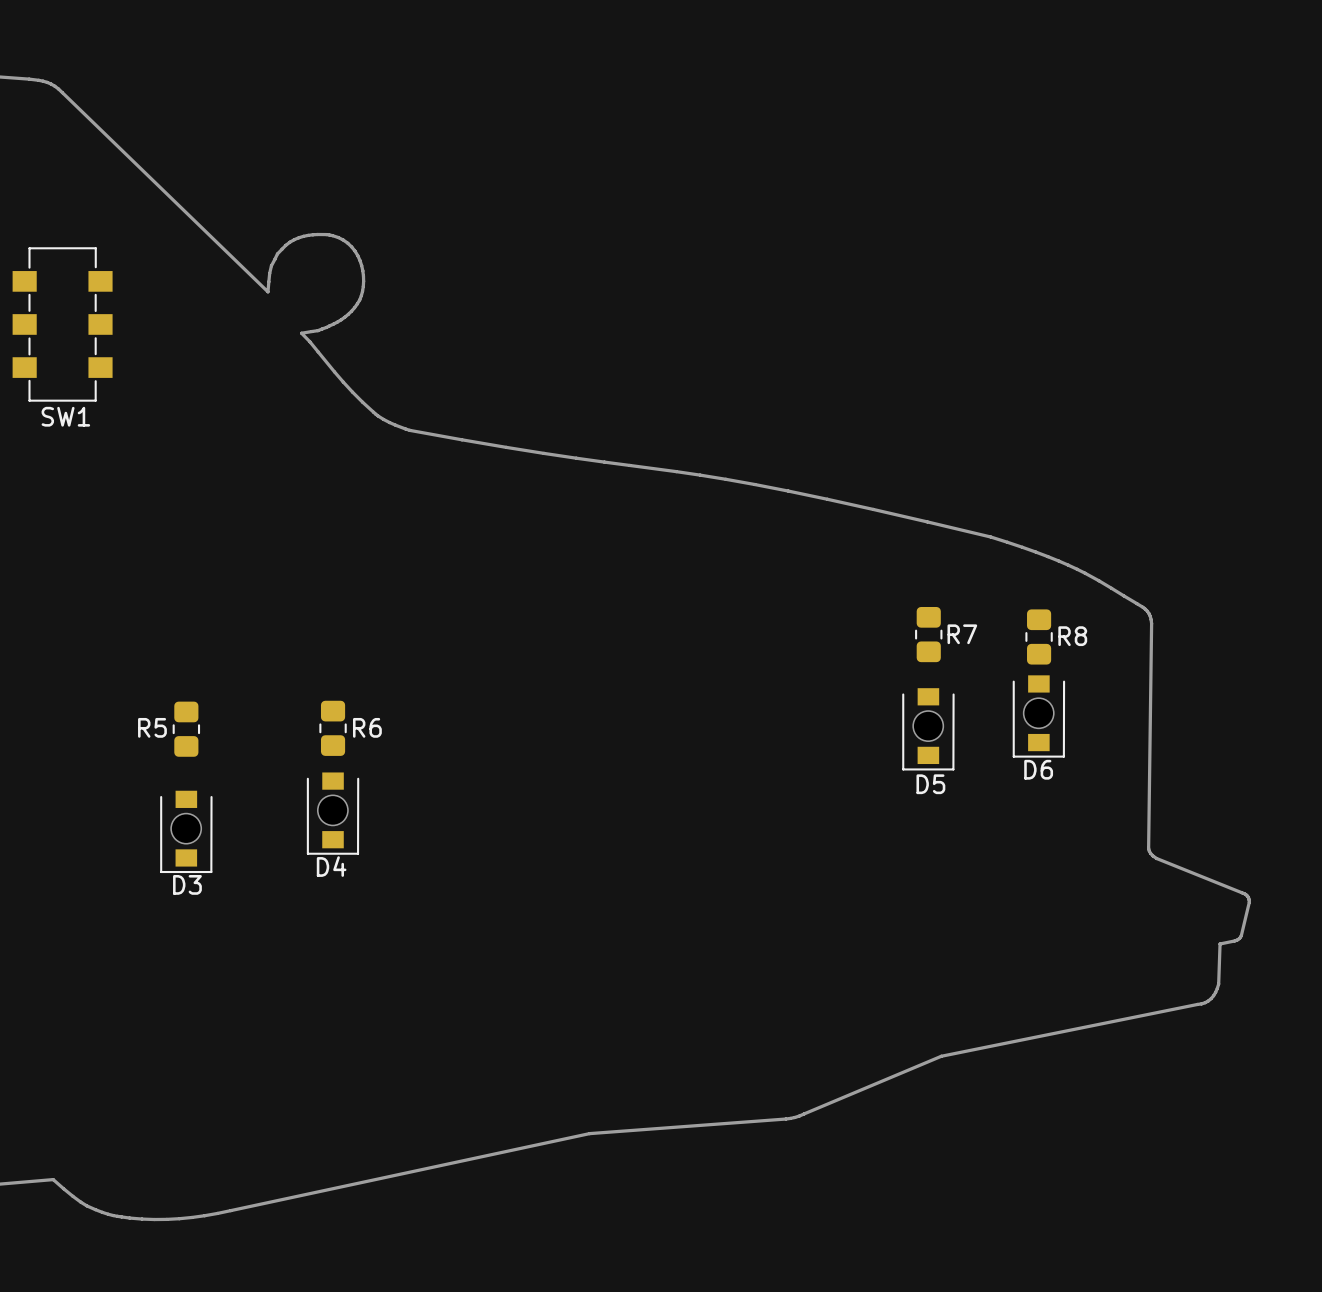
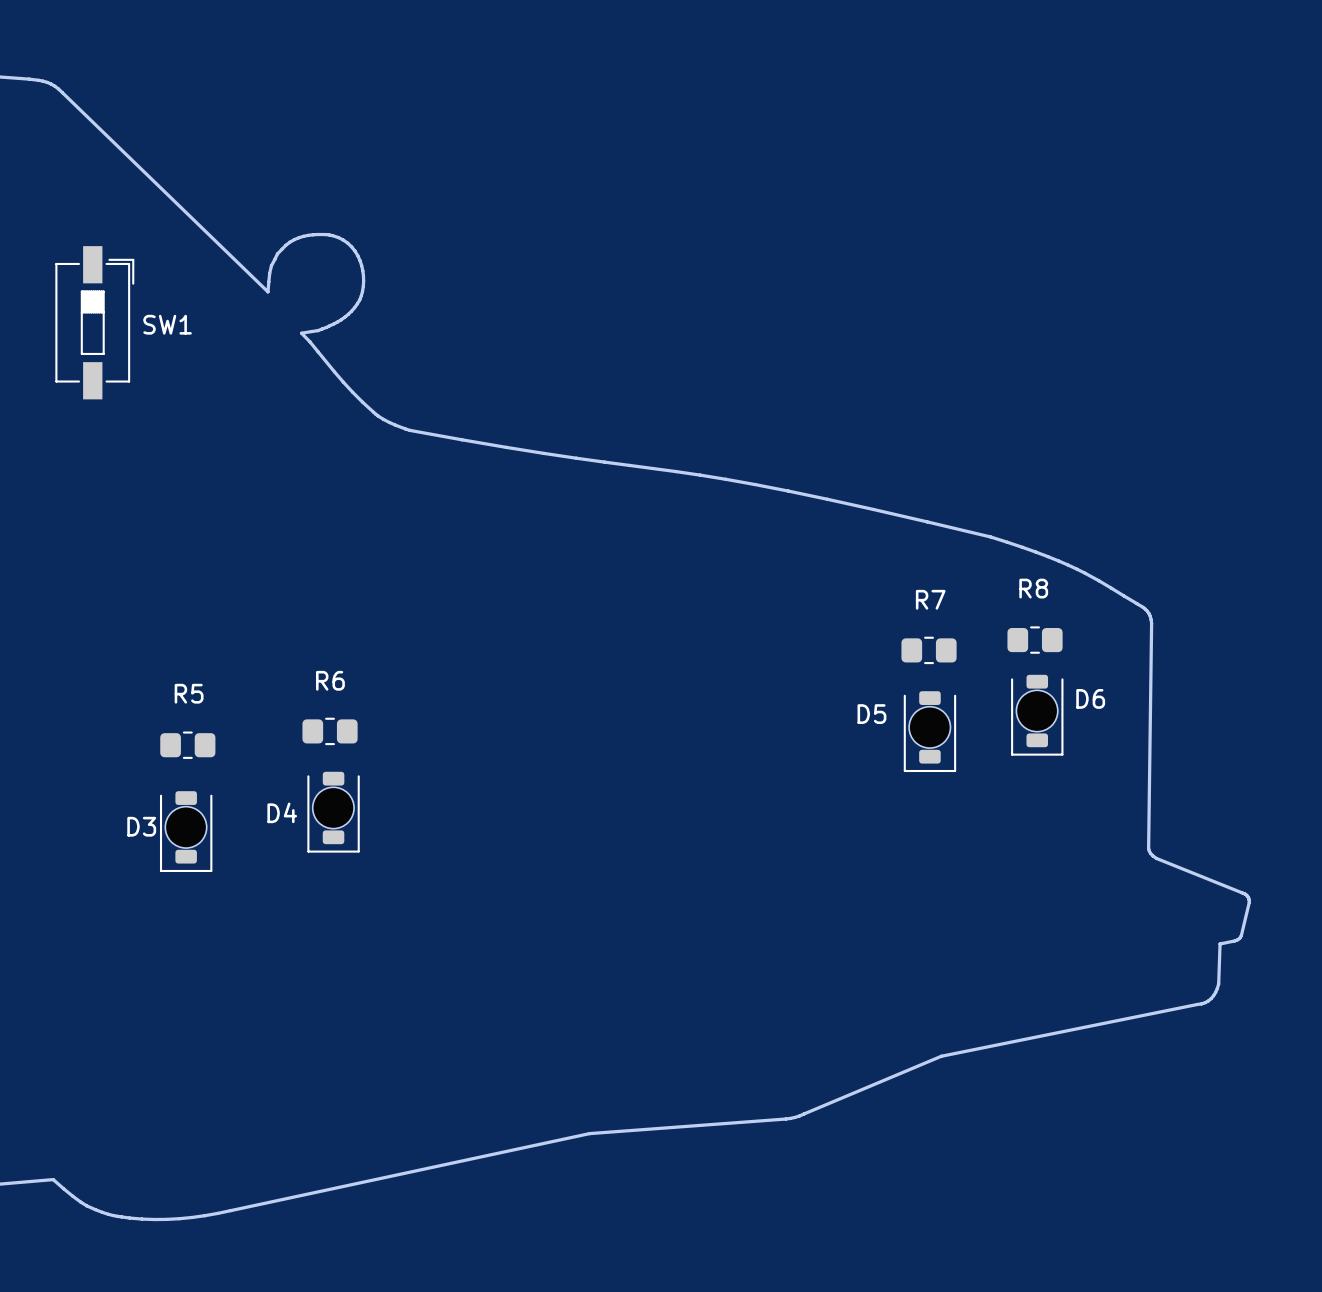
SW1 footprint: [12, 247, 113, 402] -> [55, 246, 135, 400]
SW1 name position: SW1 (65, 416) -> SW1 (167, 324)
R7 rotation: 0° (928, 634) -> 90° clockwise (929, 650)
R7 name position: R7 (962, 634) -> R7 (930, 599)
R8 rotation: 0° (1039, 636) -> 90° clockwise (1035, 640)
R8 name position: R8 (1072, 636) -> R8 (1033, 588)
D6 footprint: [1012, 675, 1066, 758] -> [1011, 674, 1064, 756]
D5 footprint: [902, 688, 955, 771] -> [903, 691, 957, 773]
R6 name position: R6 (367, 727) -> R6 (330, 680)
R6 rotation: 0° (333, 728) -> 90° clockwise (330, 731)
R5 rotation: 0° (186, 729) -> 90° clockwise (187, 745)
D6 name position: D6 (1038, 769) -> D6 (1090, 698)
D4 footprint: [306, 772, 360, 855] -> [307, 771, 360, 853]
D5 name position: D5 (930, 784) -> D5 (871, 714)
D3 footprint: [160, 790, 213, 874] -> [159, 791, 213, 873]
D4 name position: D4 (331, 866) -> D4 (282, 812)
D3 name position: D3 (187, 884) -> D3 (141, 826)

